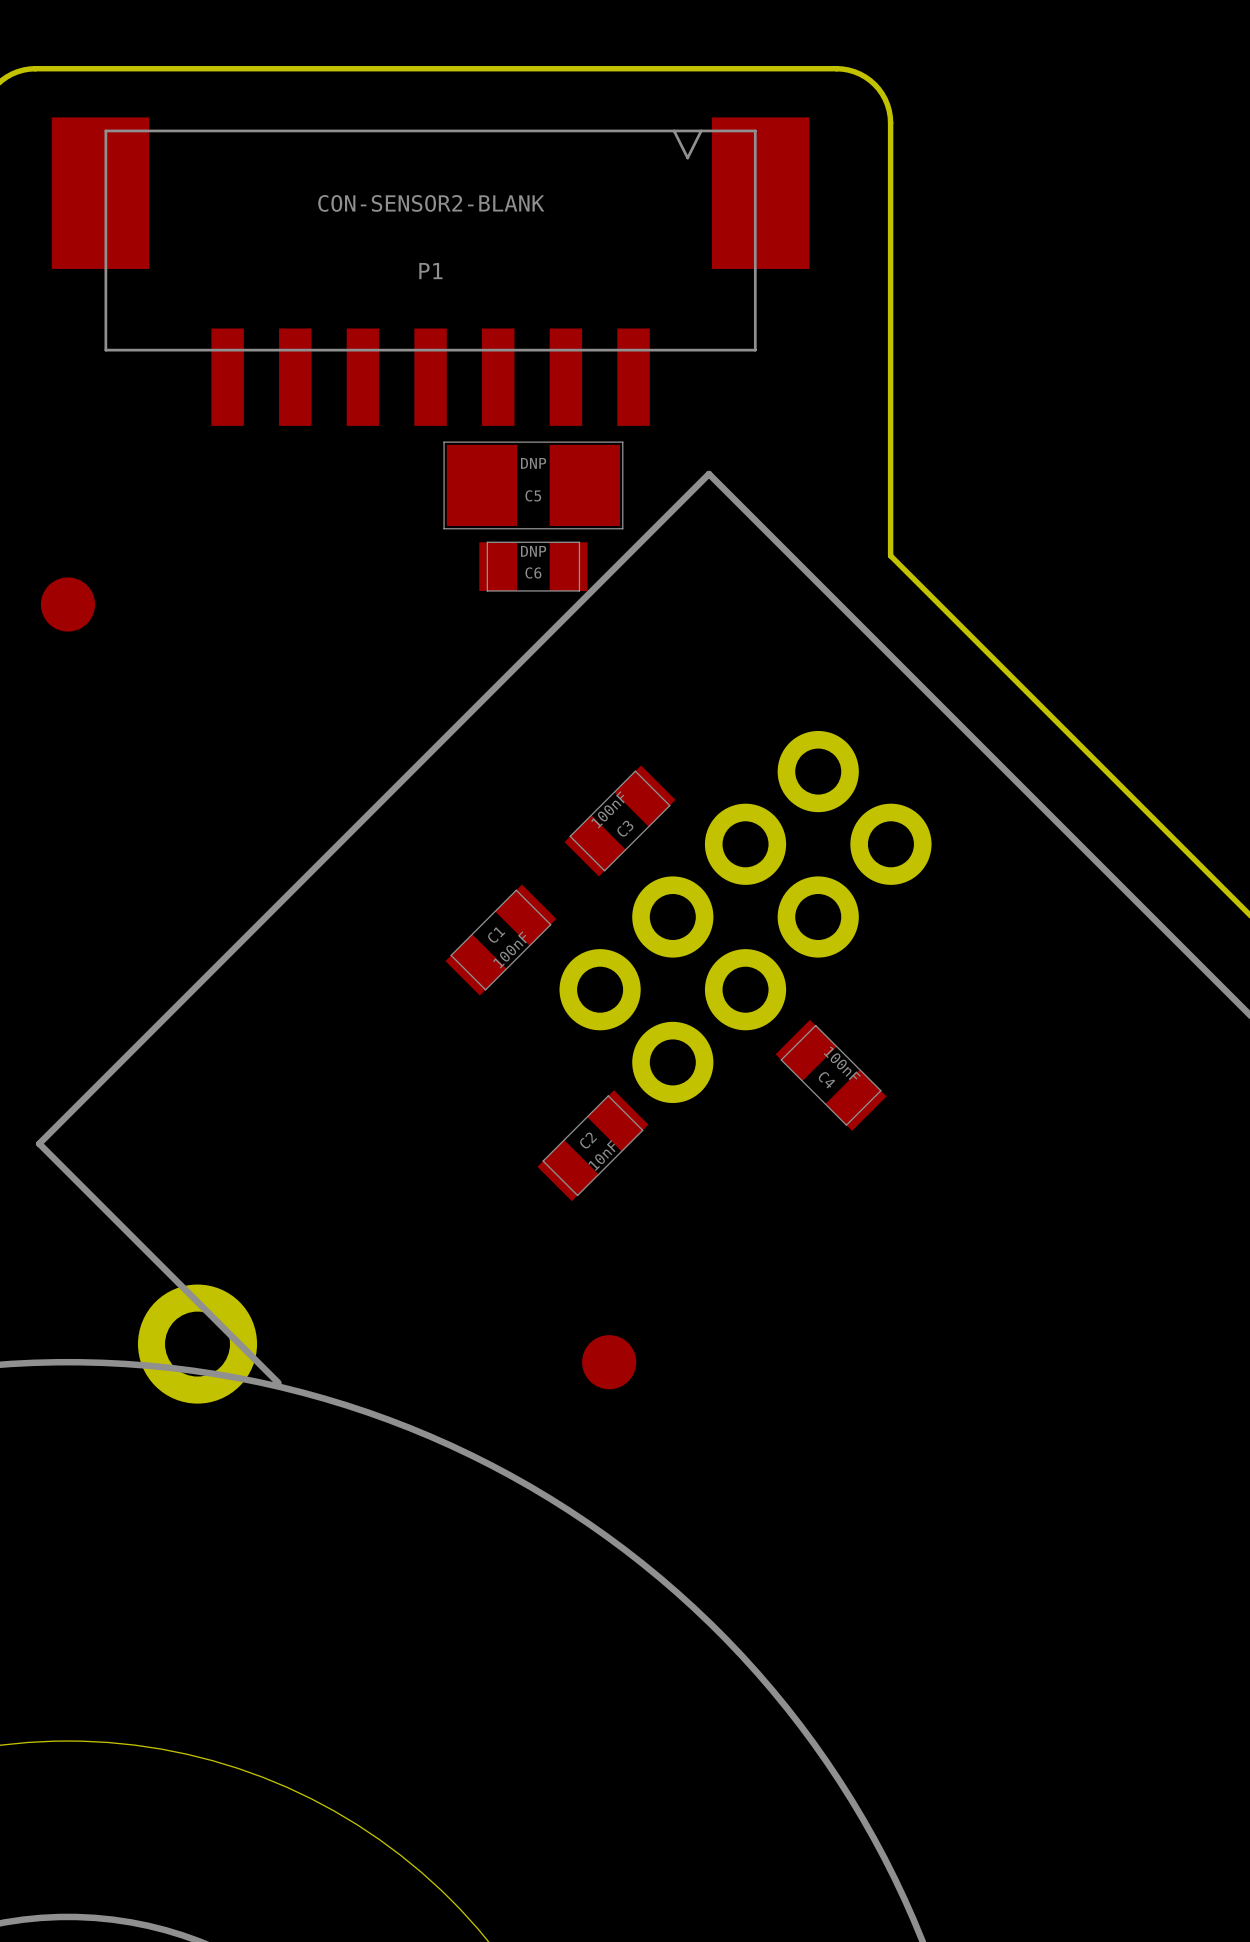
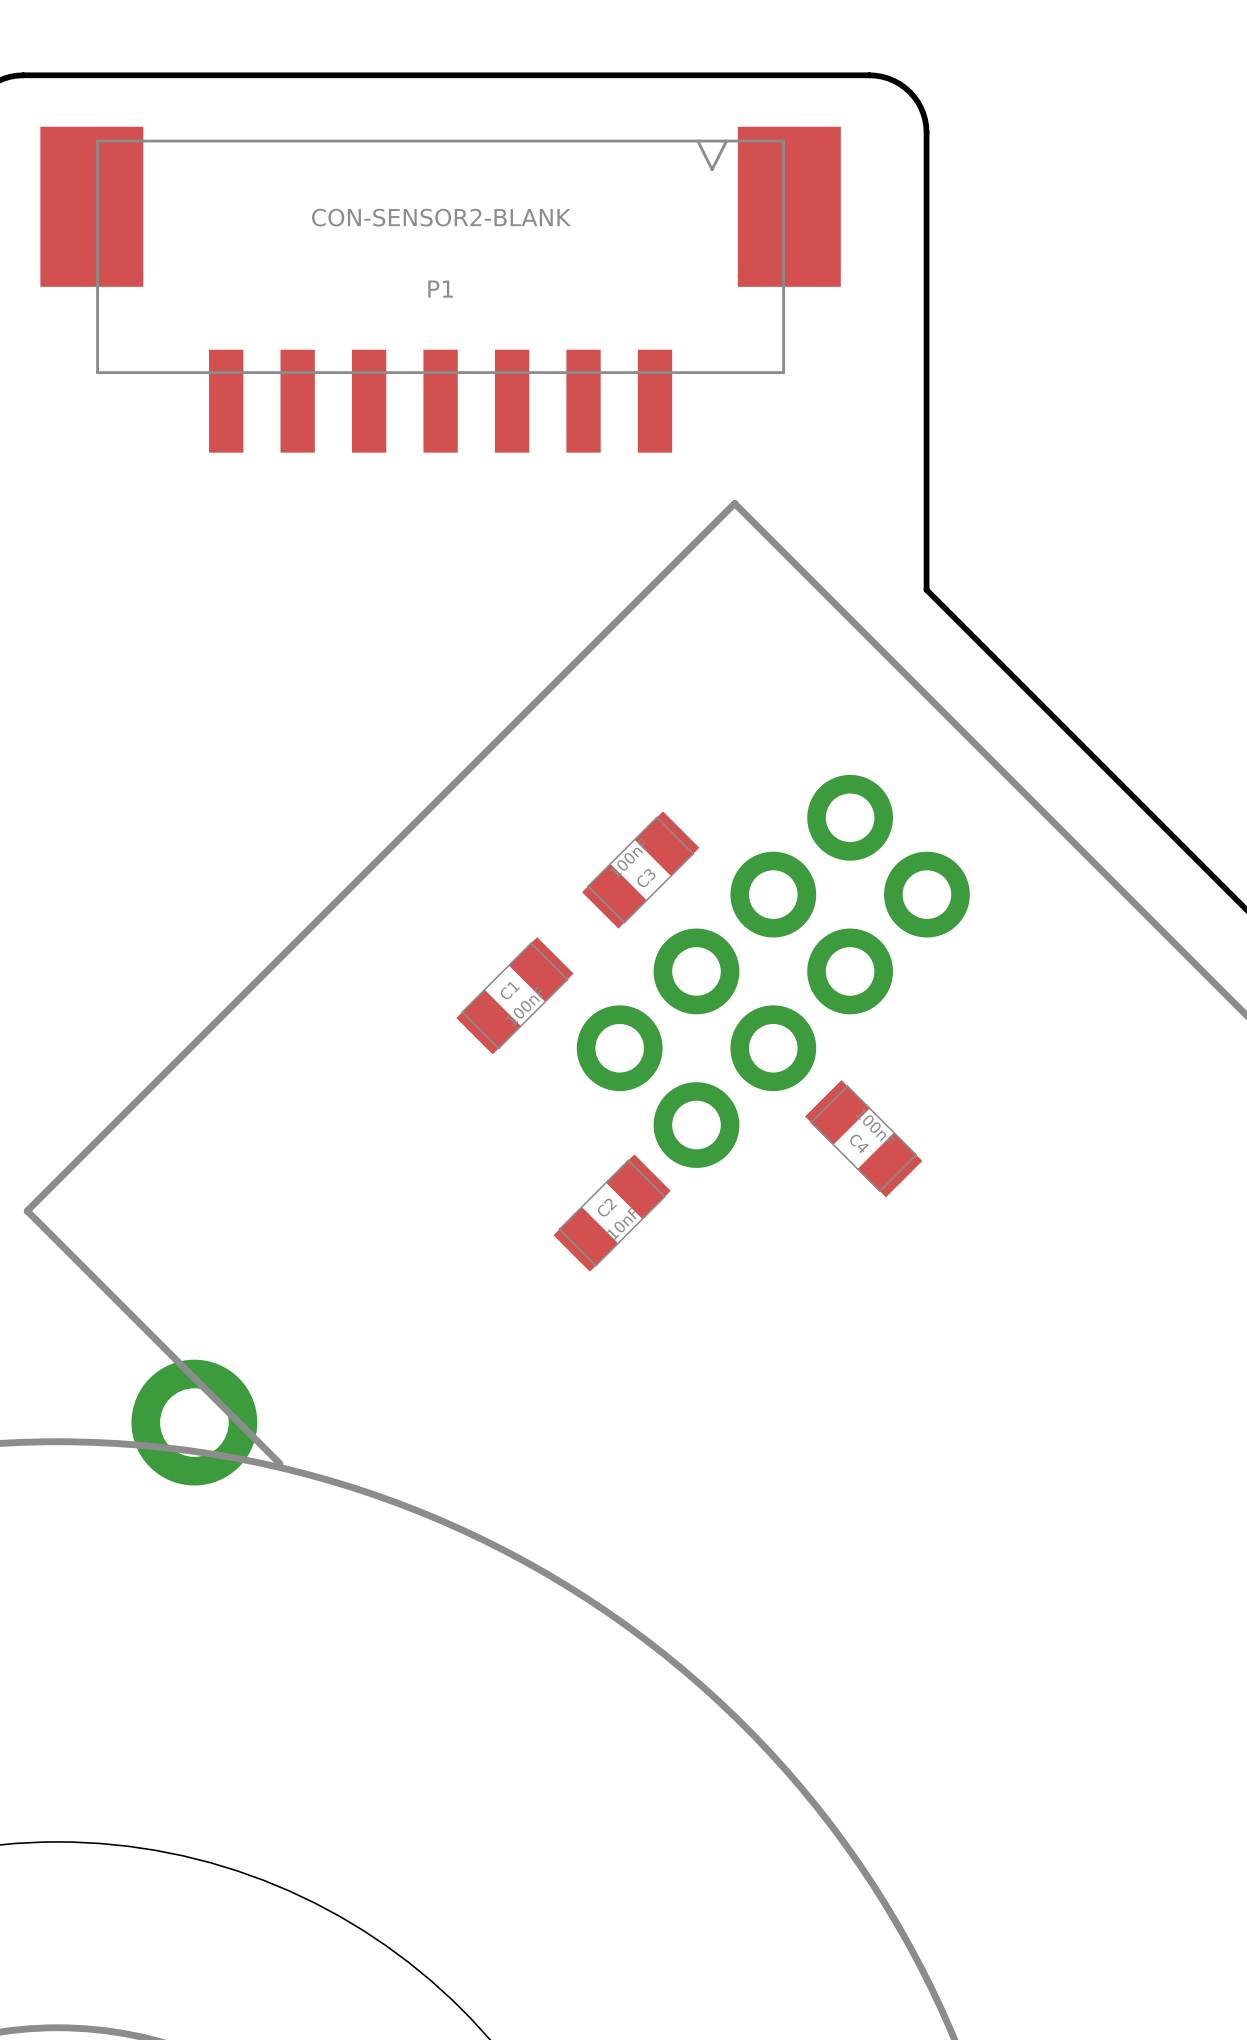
C5: DNP (533, 485) -> none
C6: DNP (533, 566) -> none
part: (67, 604) -> none
part: (609, 1362) -> none

